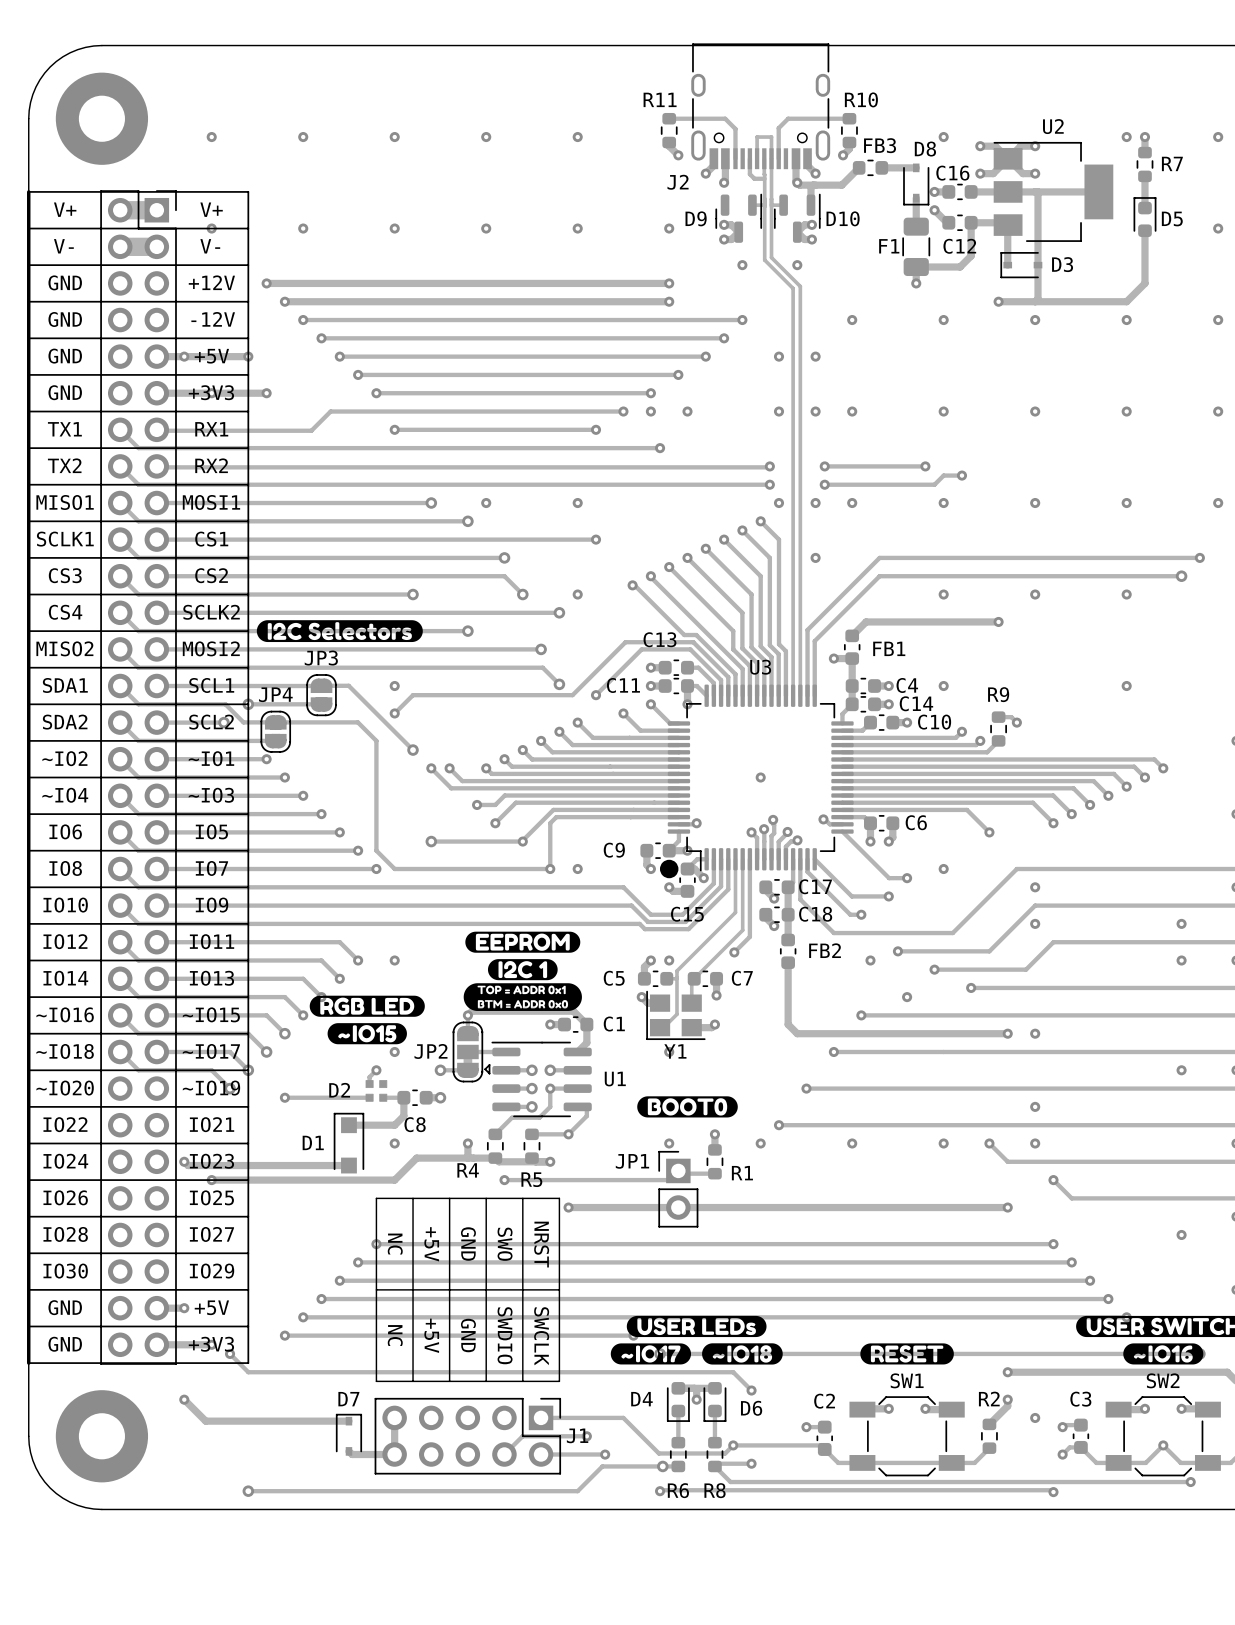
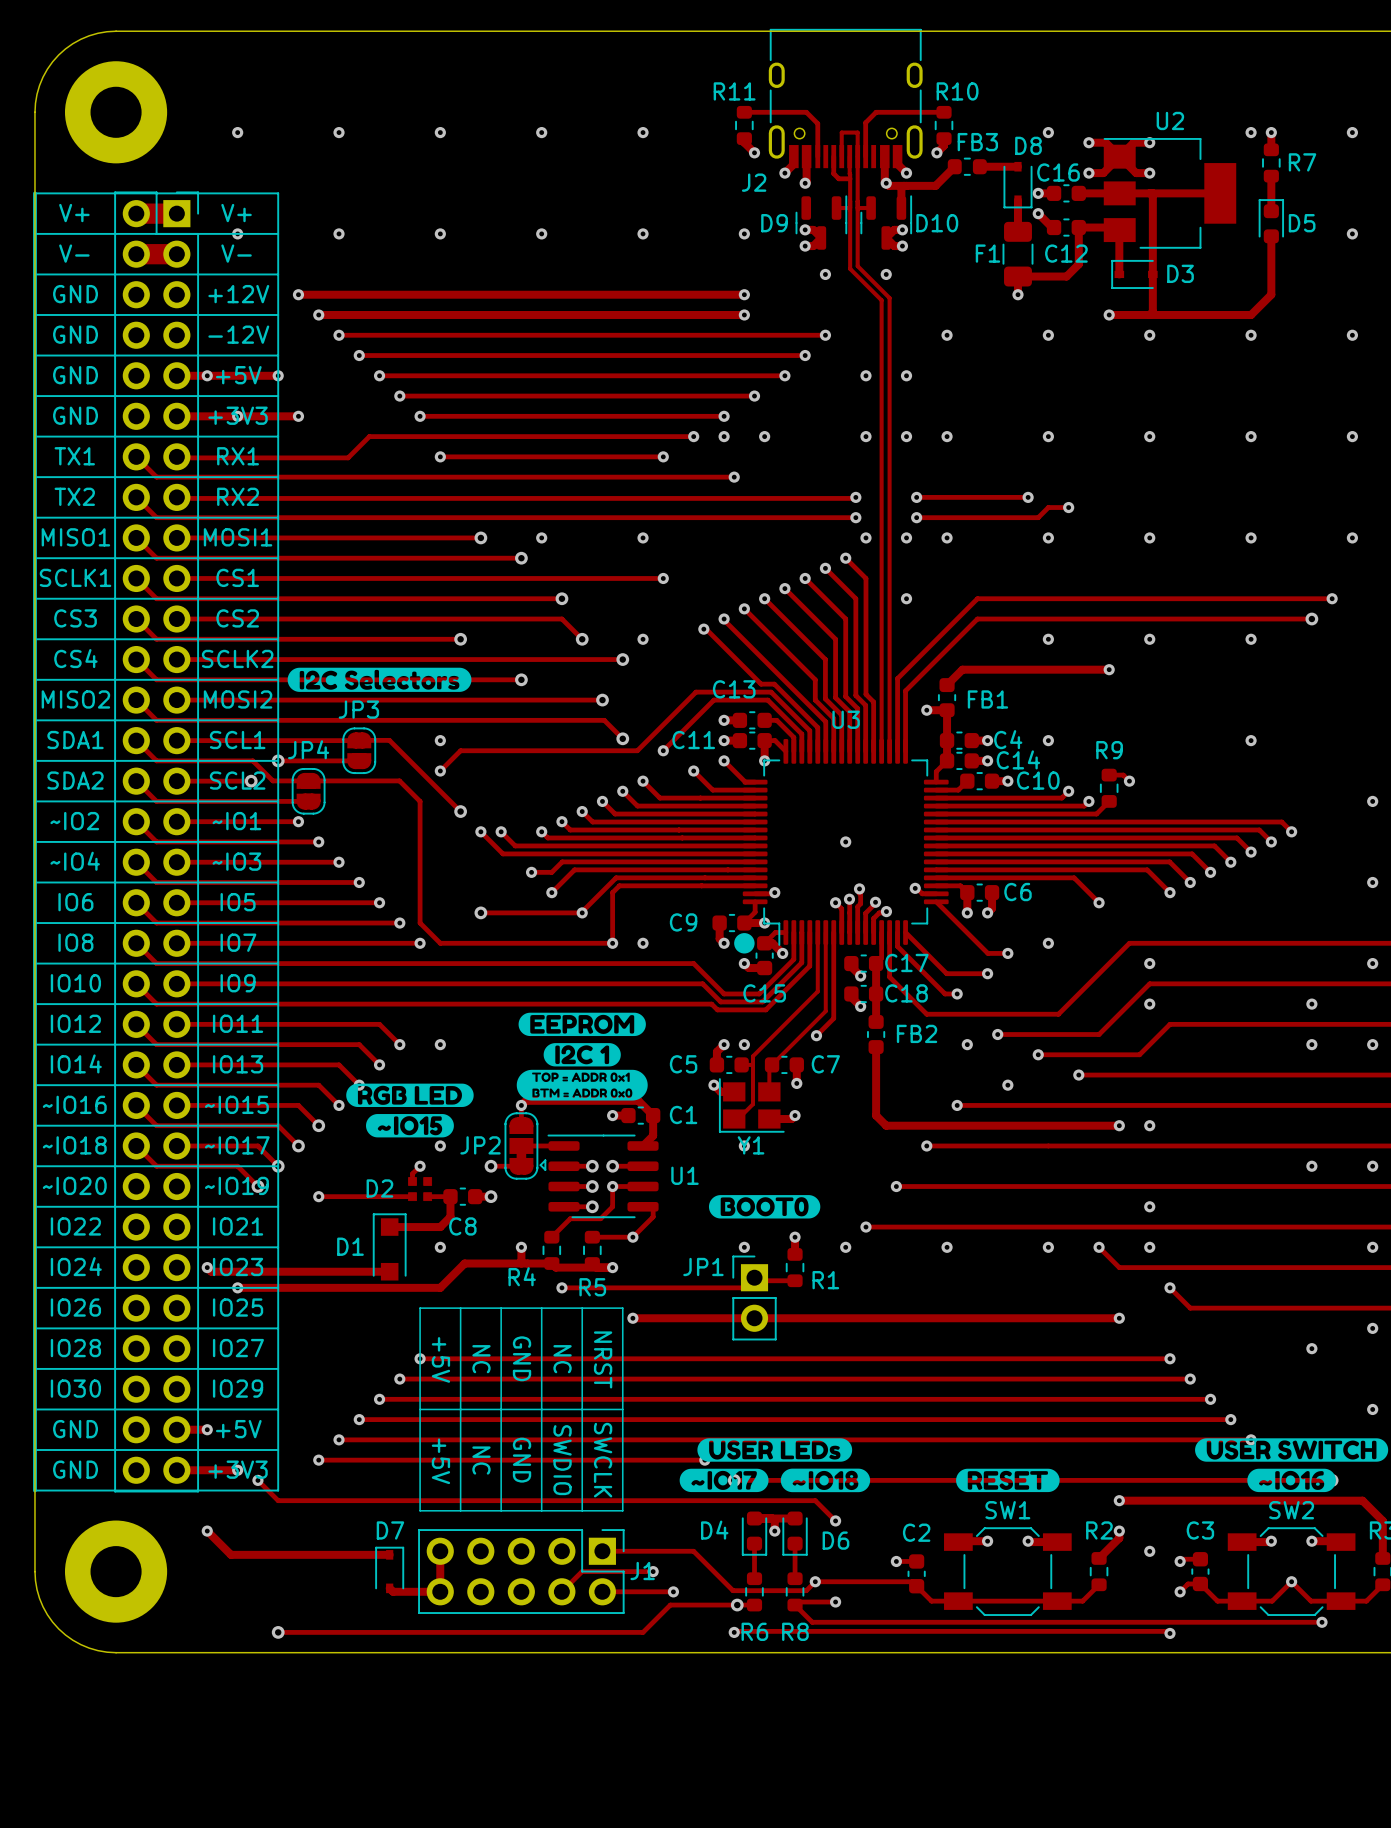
text: NC (395, 1244) -> +5V (440, 1359)
text: +5V (431, 1244) -> NC (481, 1359)
text: SWO (505, 1244) -> NC (562, 1359)
text: NC (395, 1335) -> +5V (440, 1461)
text: +5V (431, 1335) -> NC (481, 1460)

